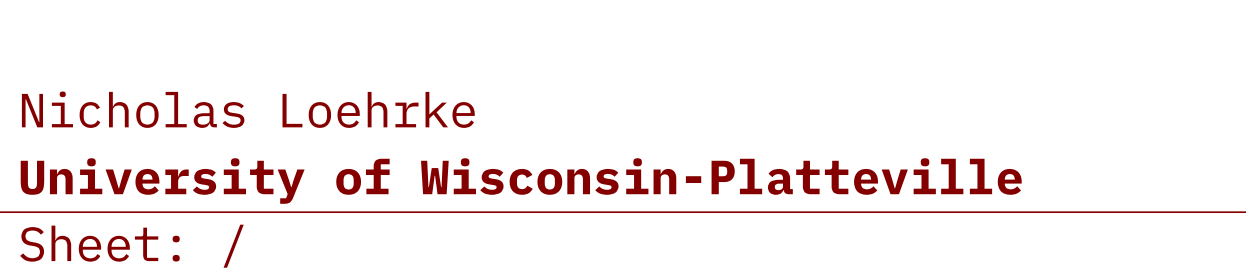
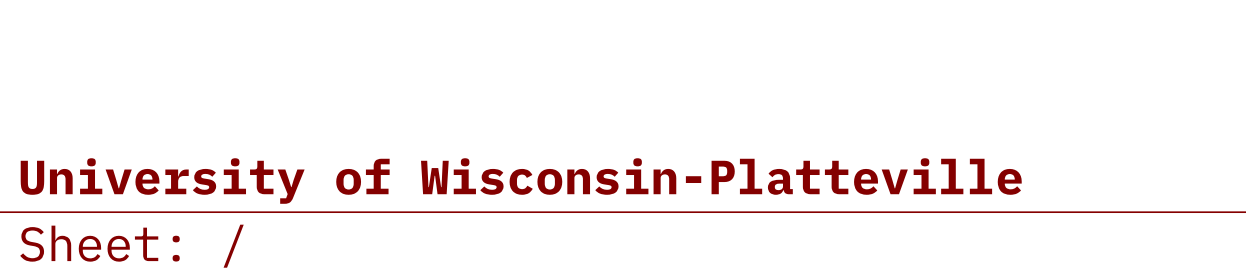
title block: Nicholas Loehrke (248, 109) -> none

